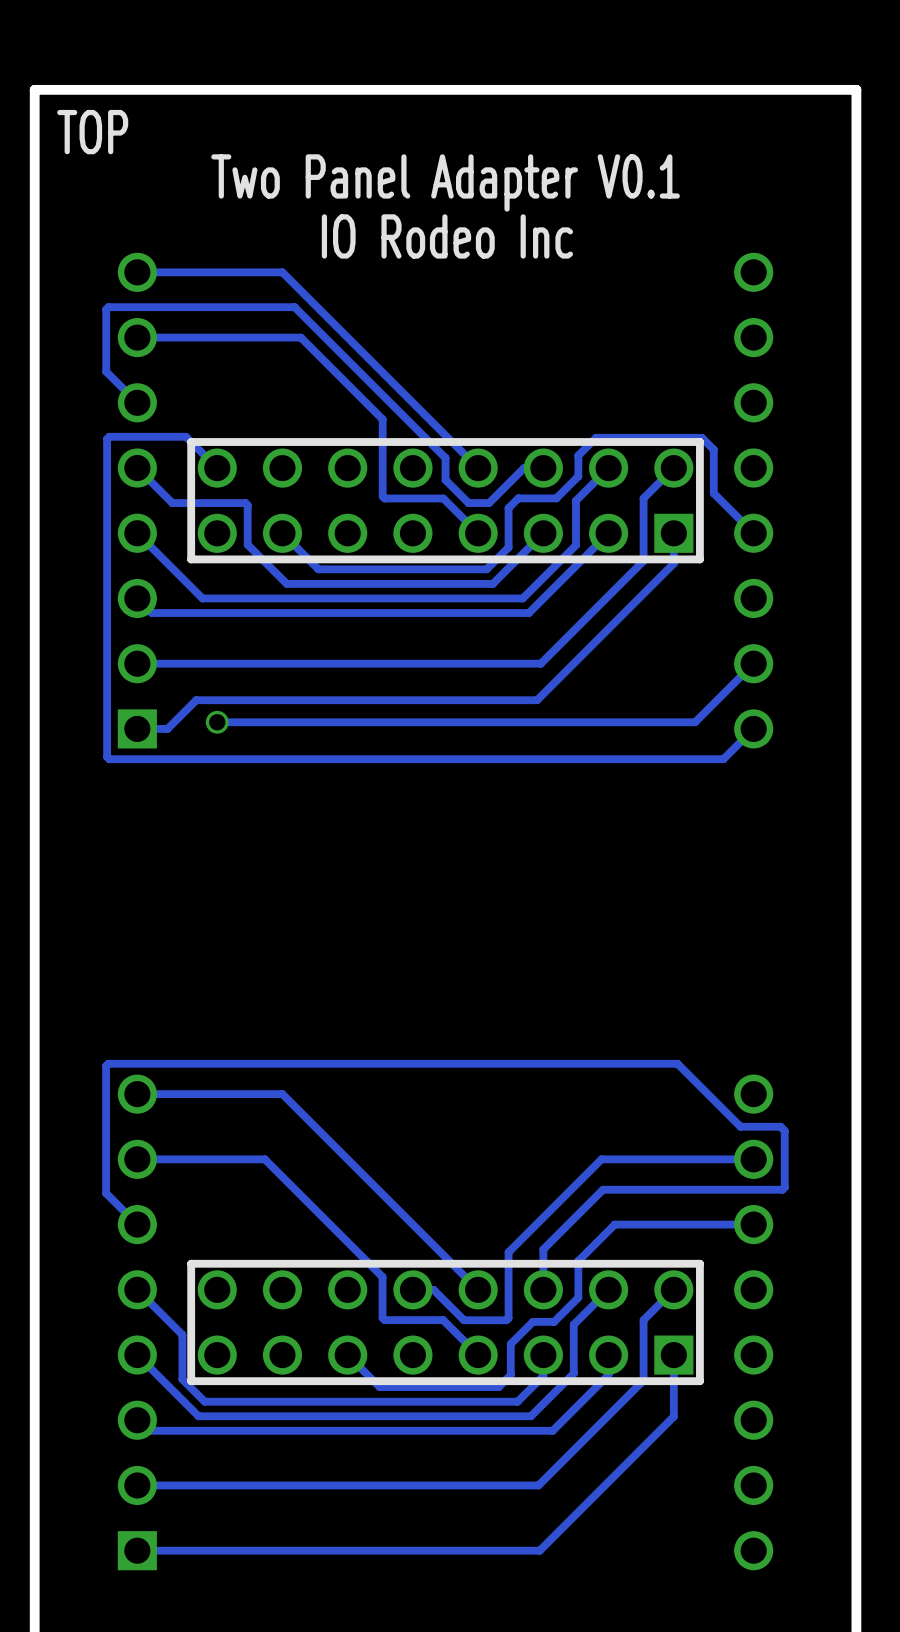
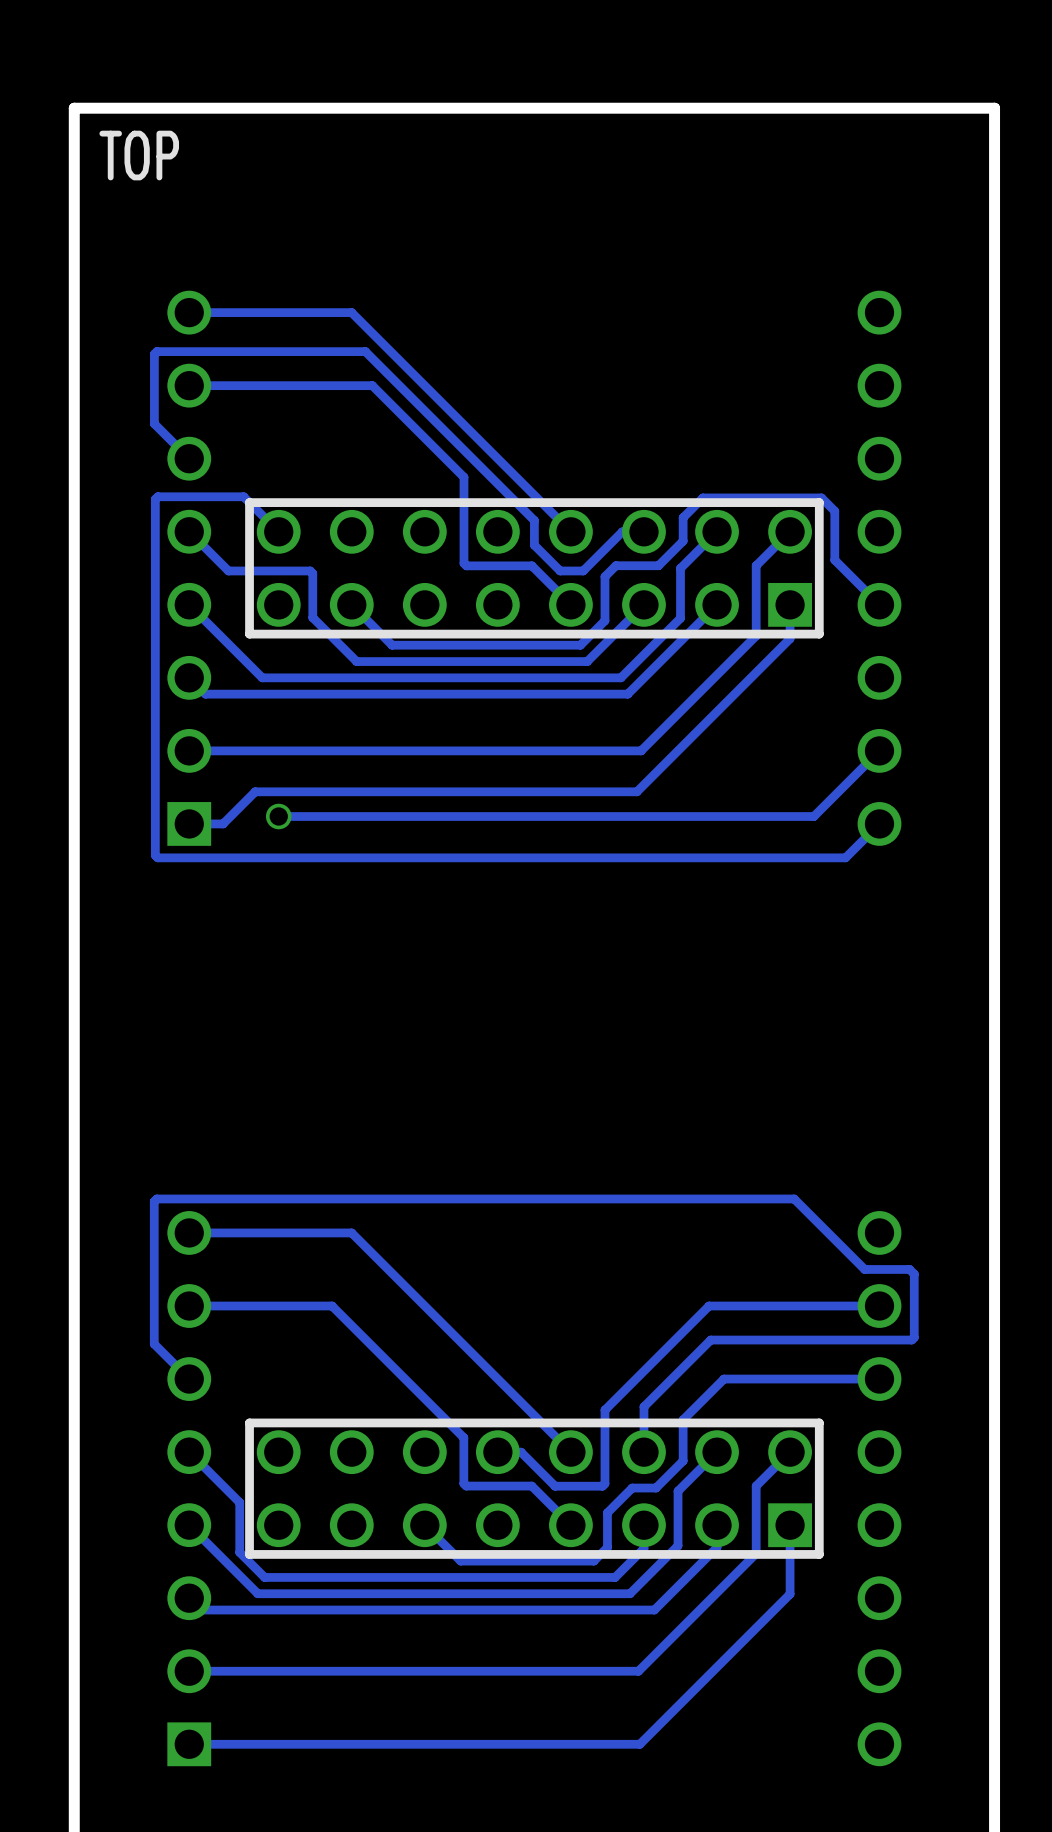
text: Two Panel Adapter V0.1 (445, 182) -> none
text: IO Rodeo Inc (447, 236) -> none

